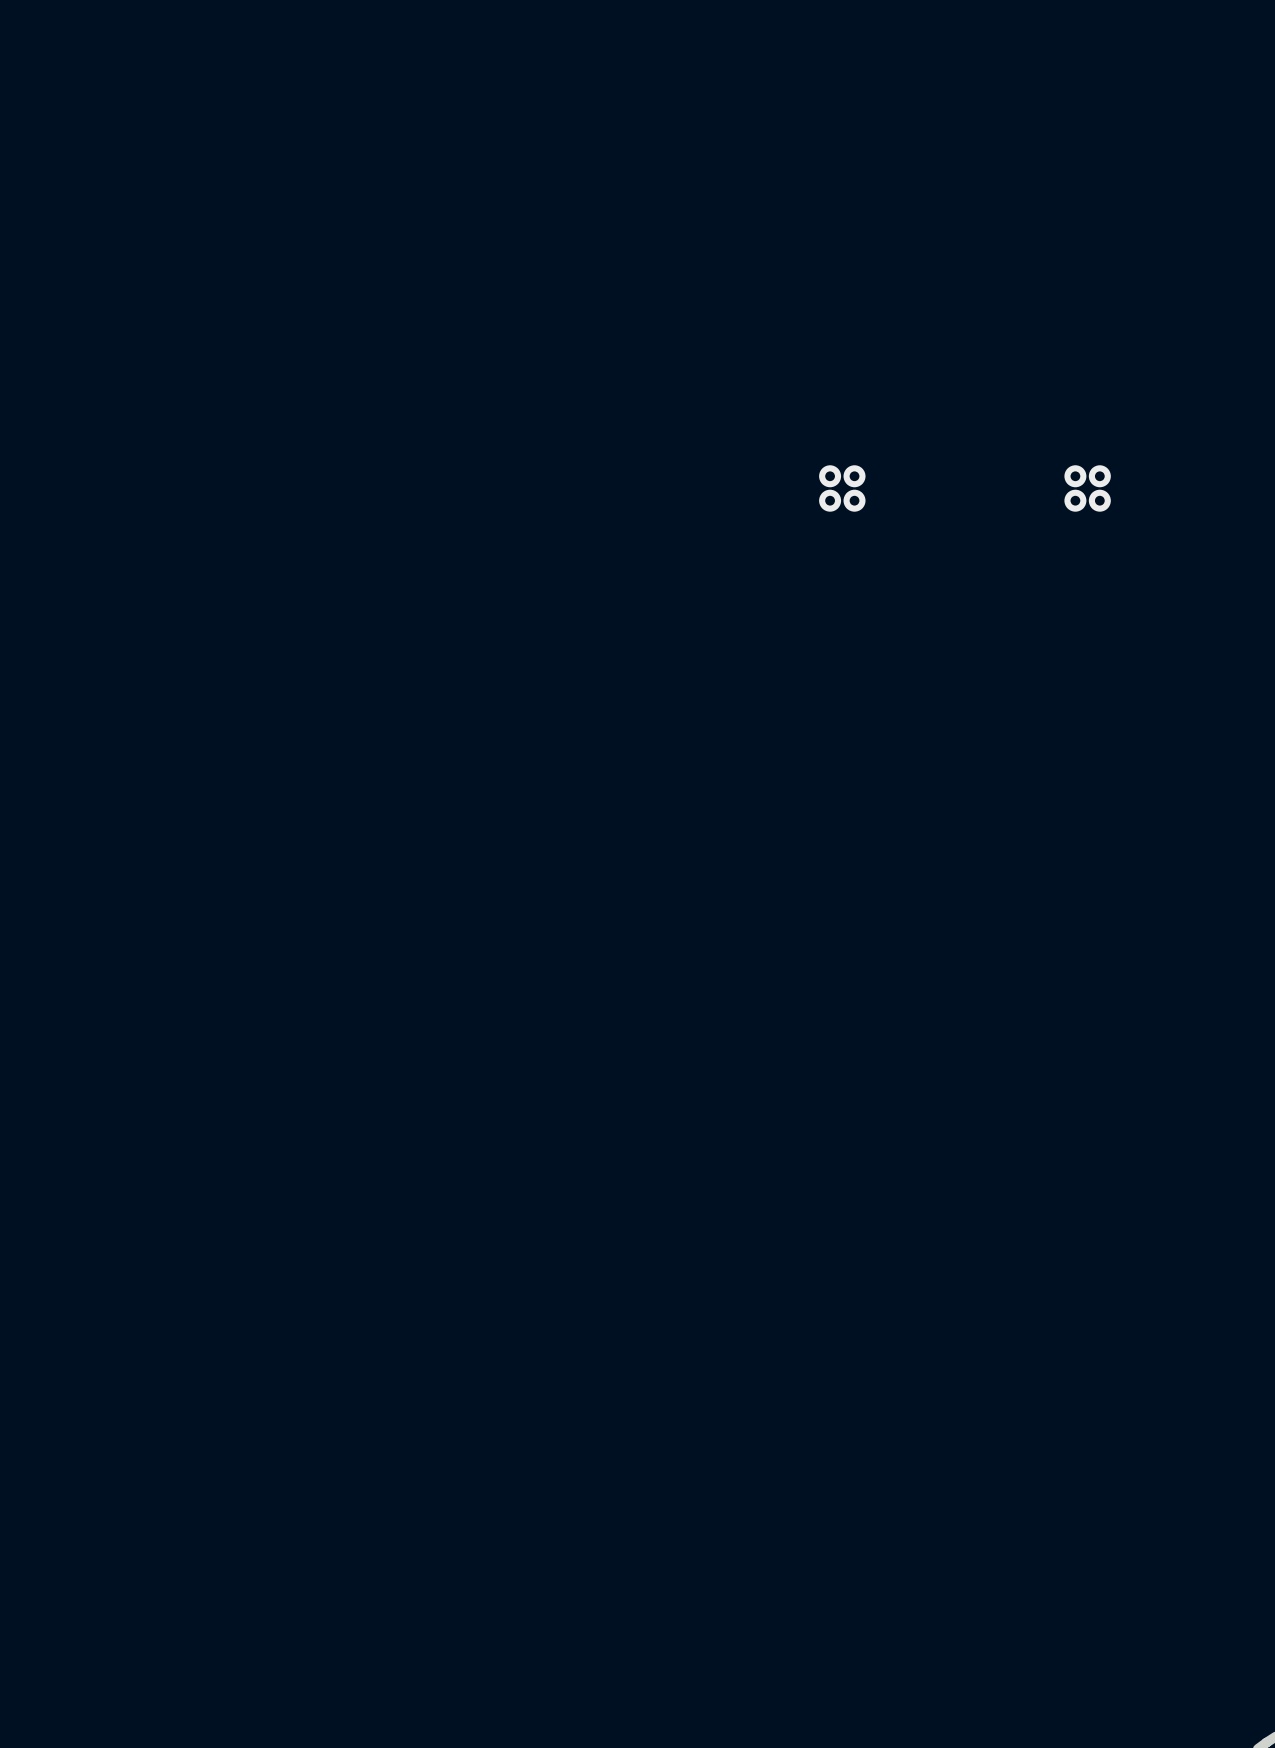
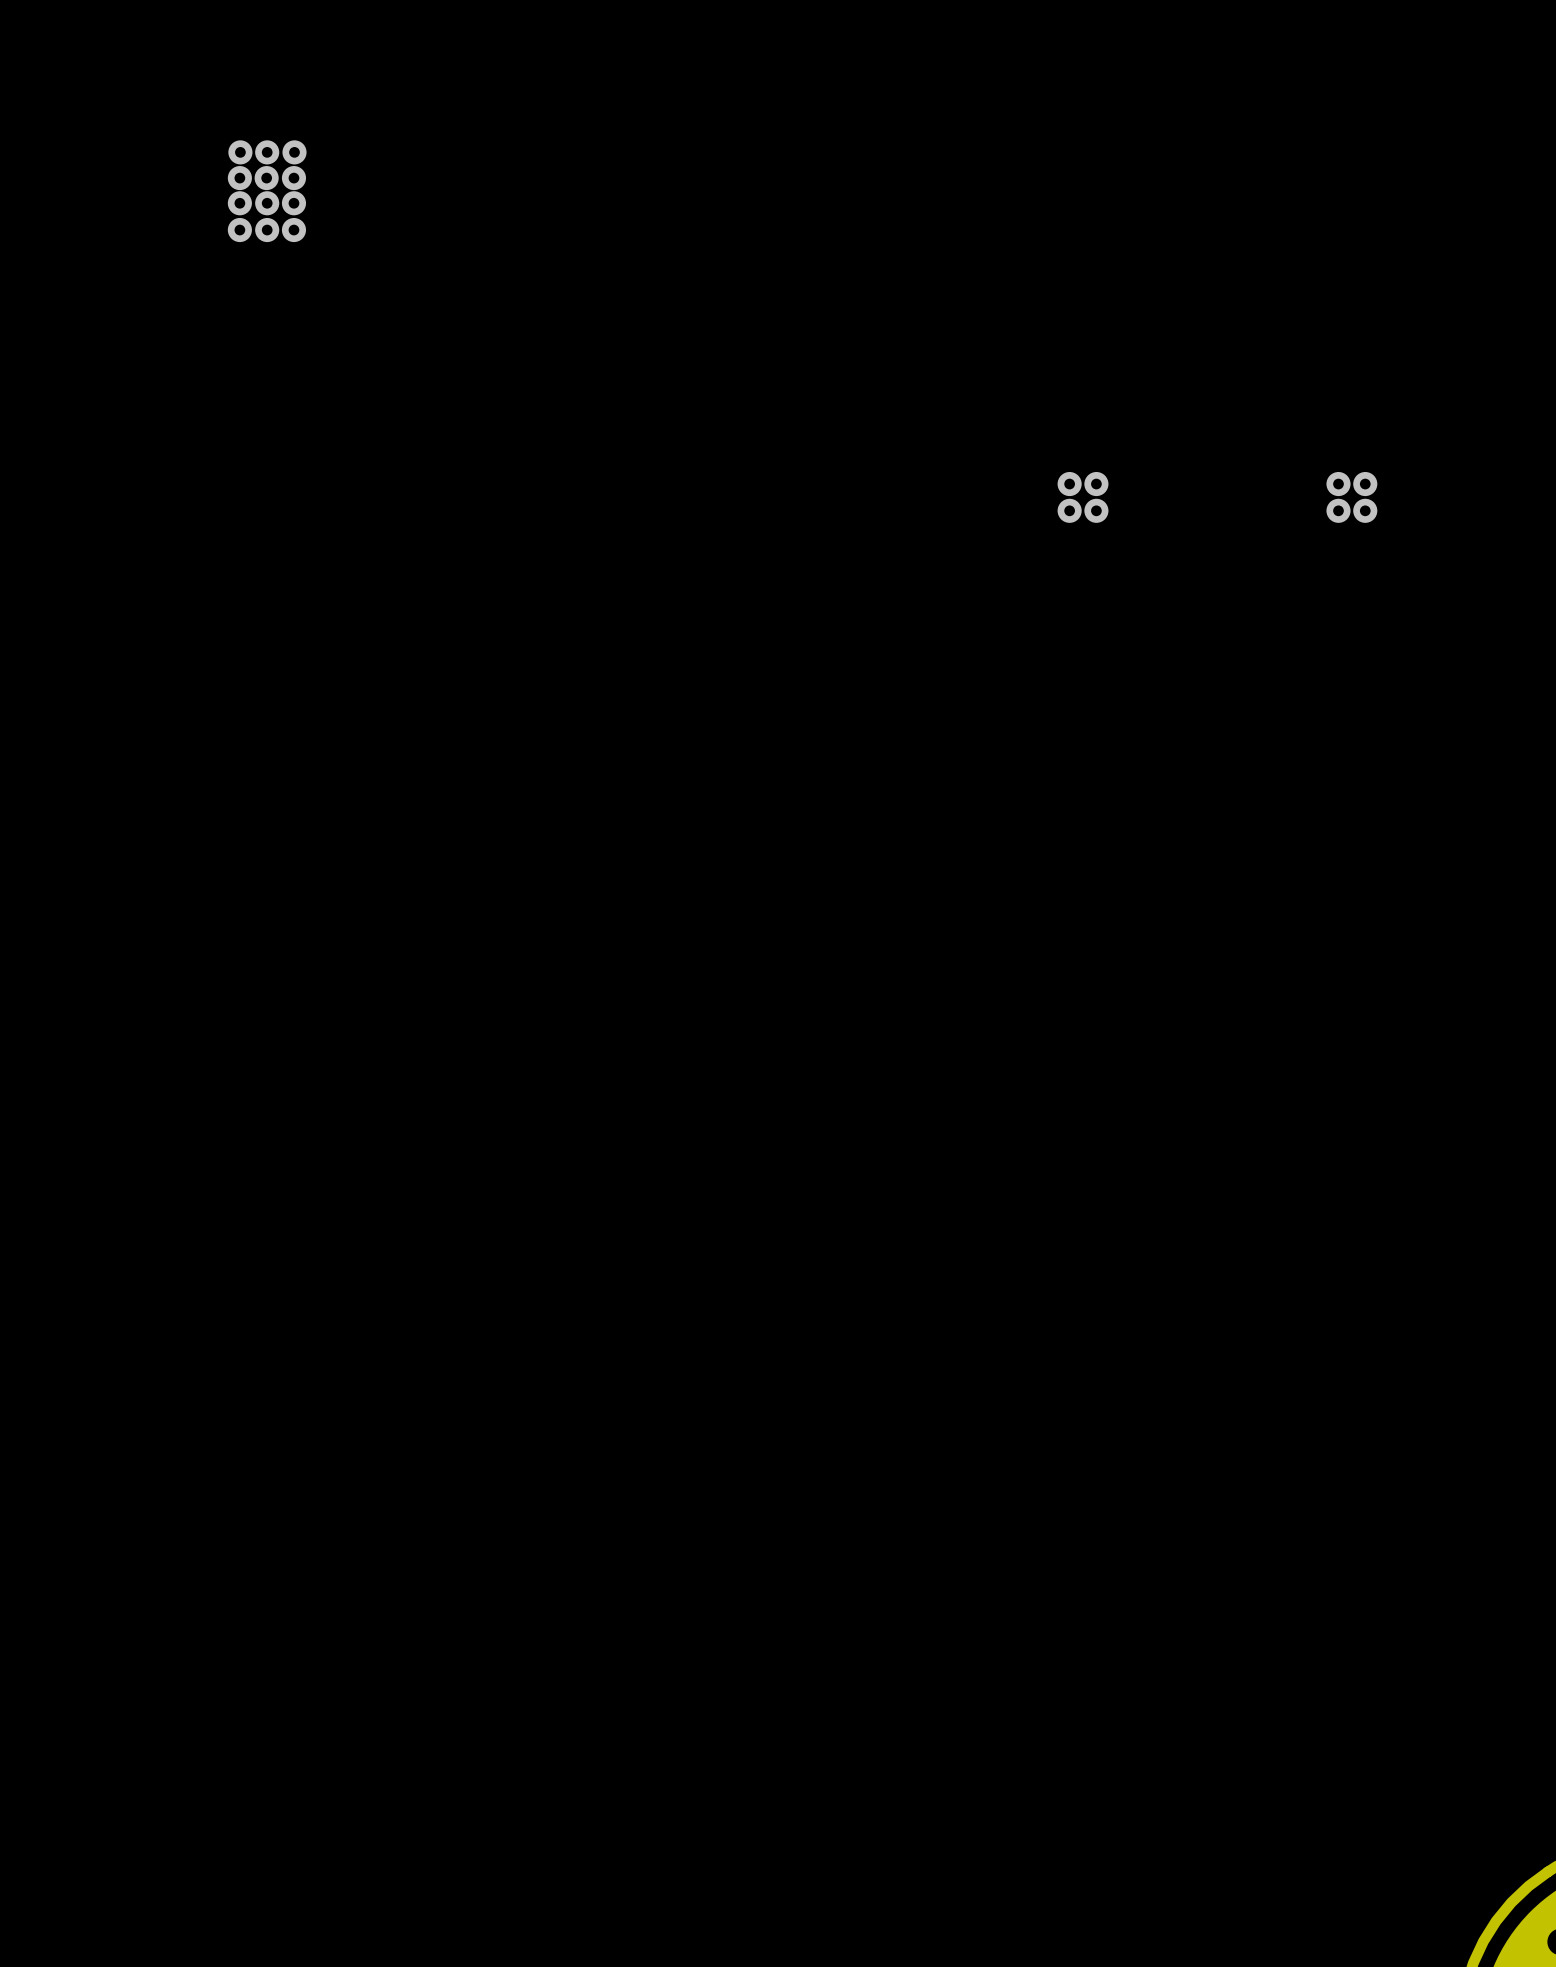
via: none -> (240, 152)
via: none -> (267, 152)
via: none -> (294, 152)
via: none -> (239, 178)
via: none -> (266, 178)
via: none -> (293, 178)
via: none -> (239, 203)
via: none -> (267, 203)
via: none -> (293, 203)
via: none -> (239, 230)
via: none -> (267, 230)
via: none -> (293, 230)

